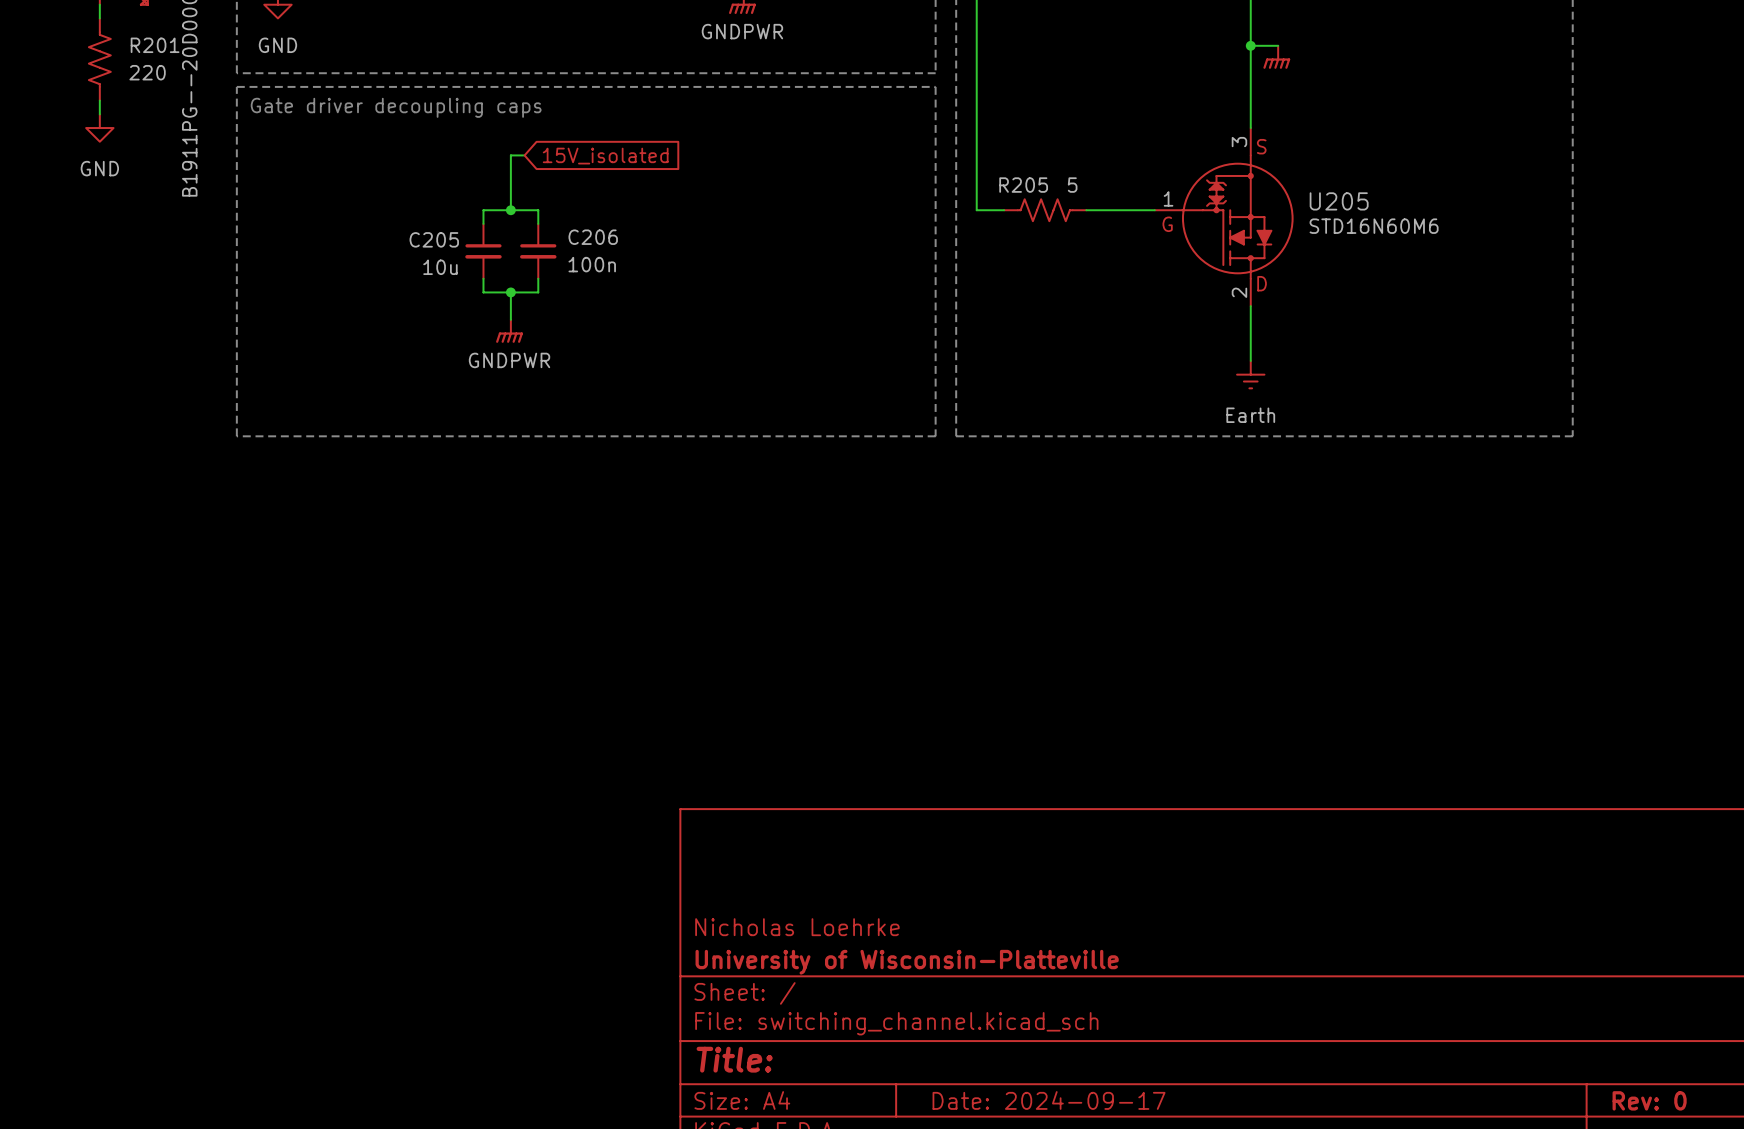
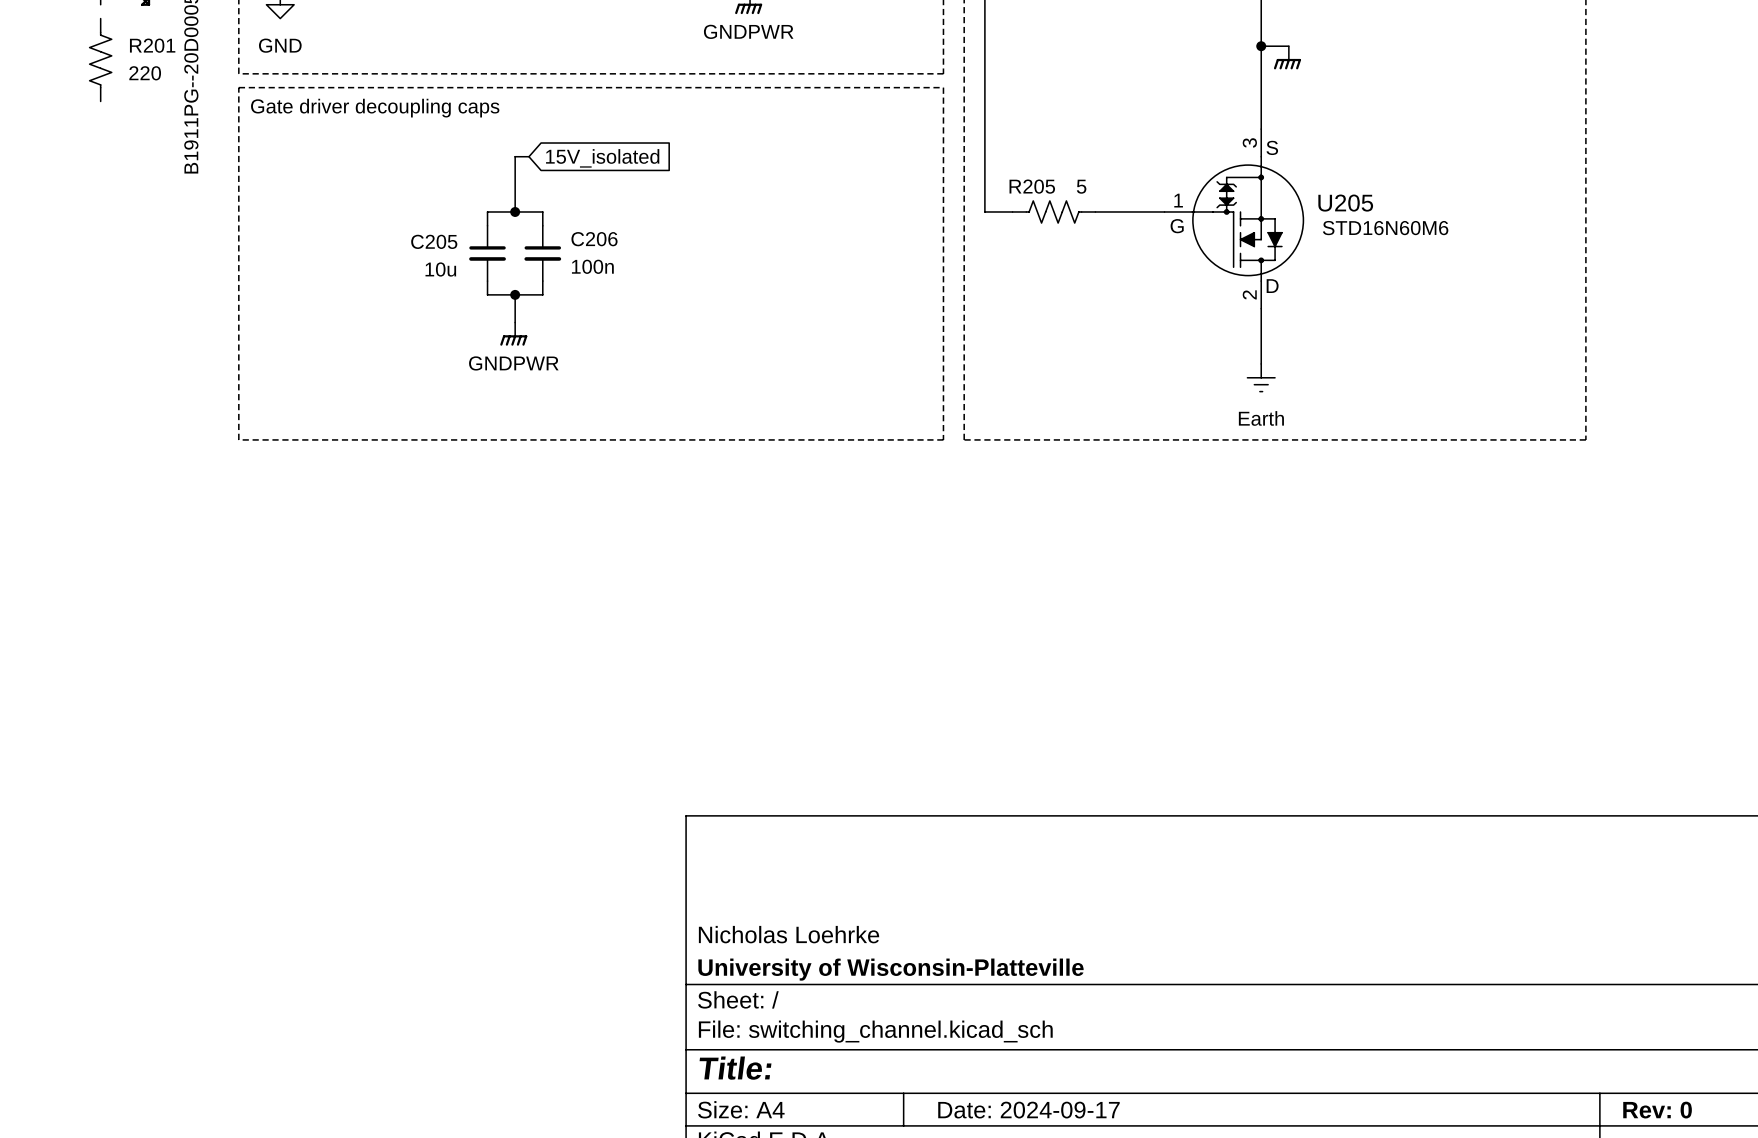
wire: (99, 4) (99, 18) -> none
wire: (99, 100) (99, 114) -> none
power symbol: GND (99, 128) -> none

